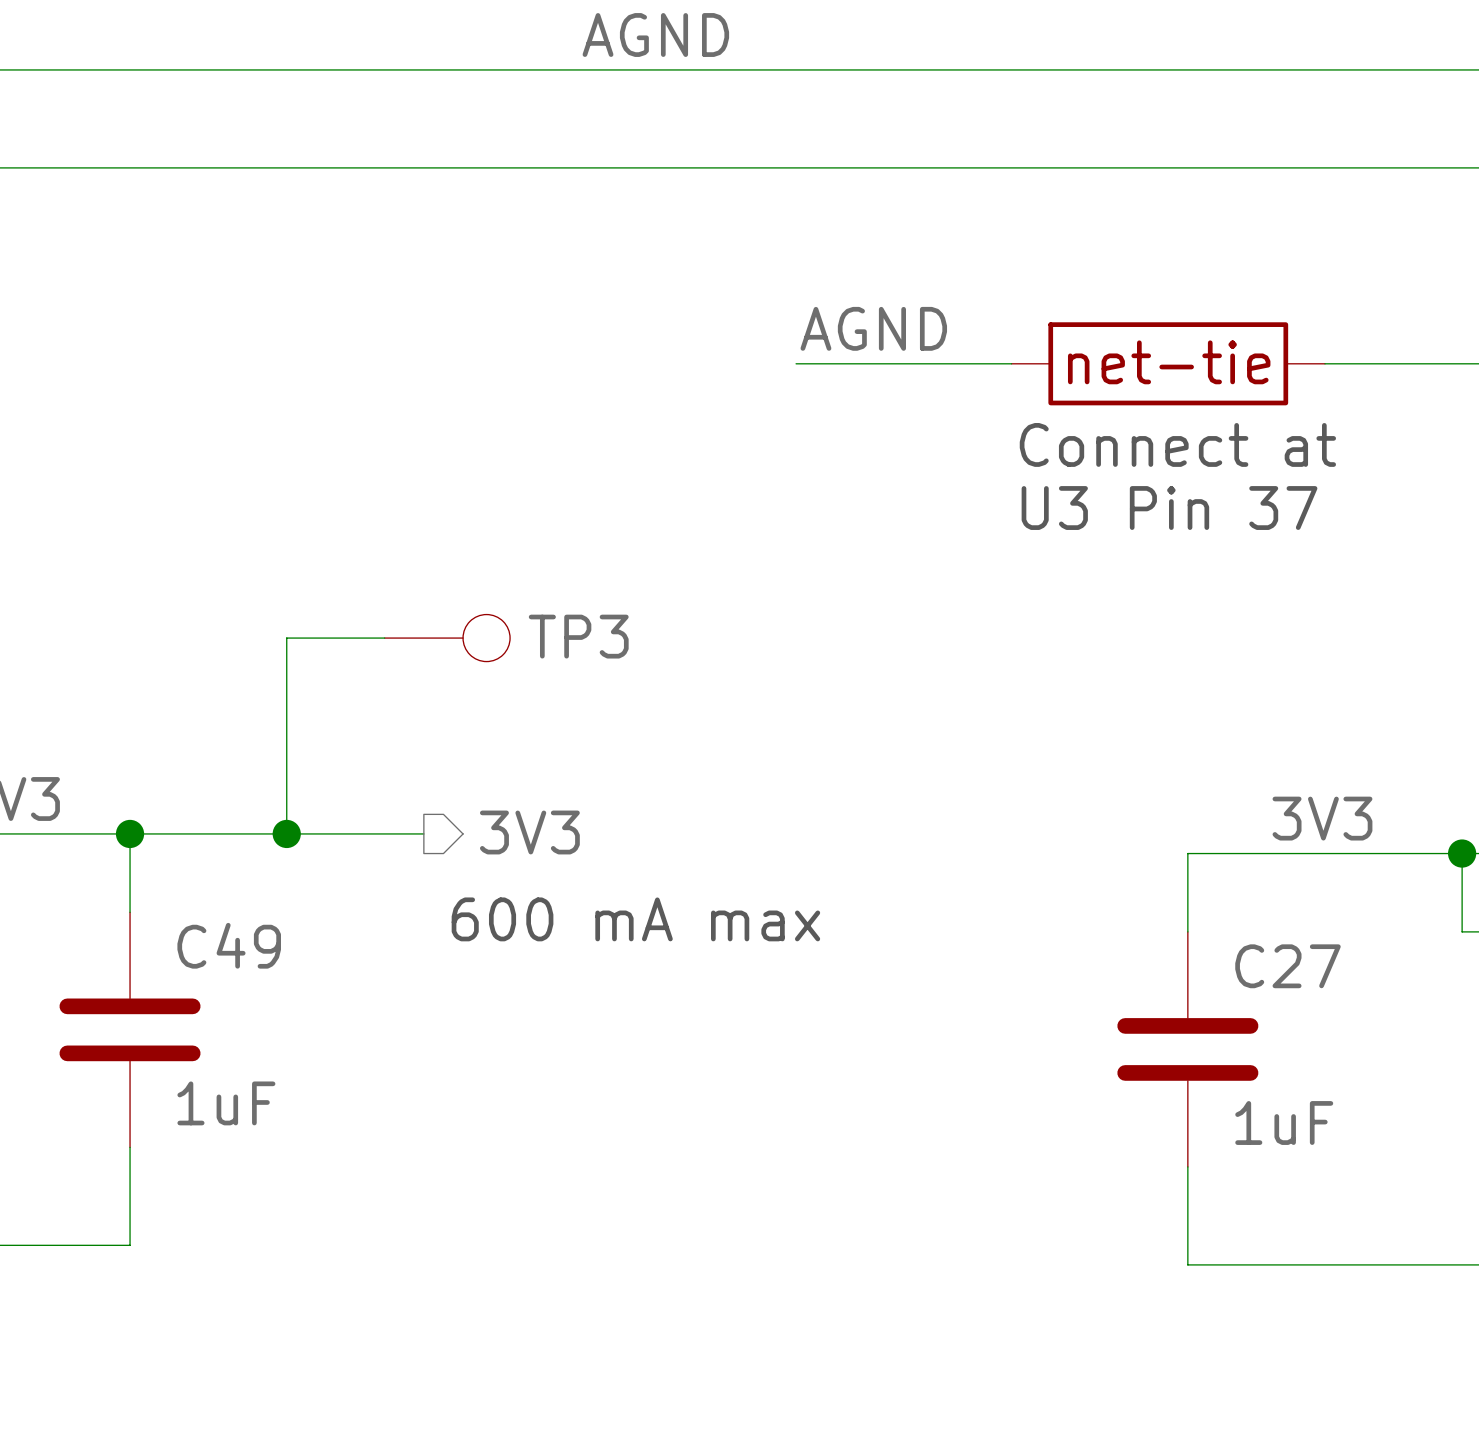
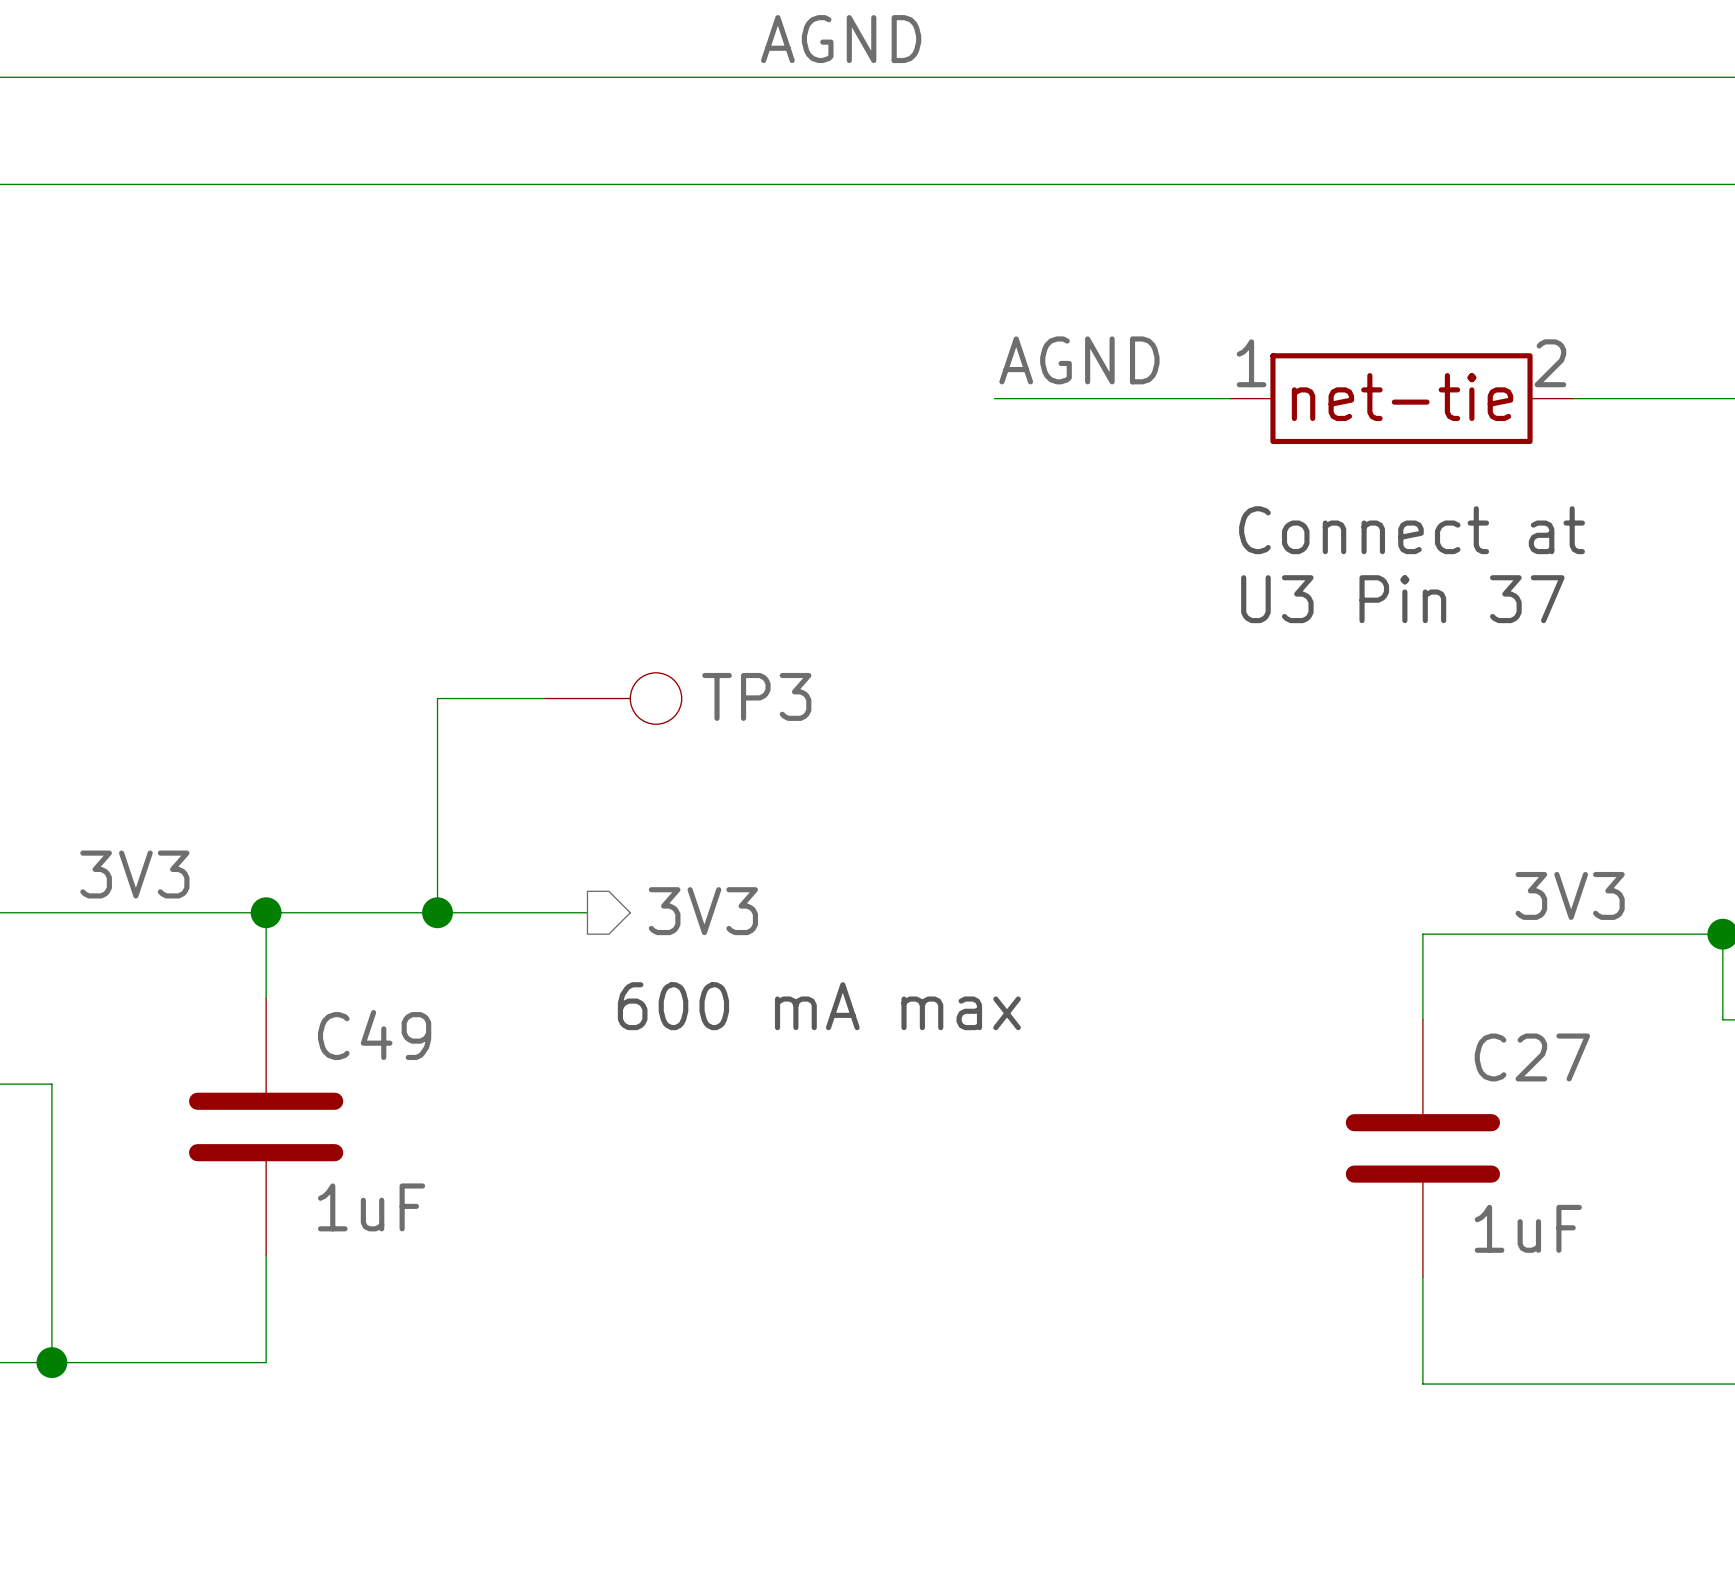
part pin number: none -> 1 (1251, 363)
part pin number: none -> 2 (1550, 363)
text position: Connect at (1177, 444) -> Connect at (1412, 530)
text position: U3 Pin 37 (1169, 508) -> U3 Pin 37 (1402, 599)

